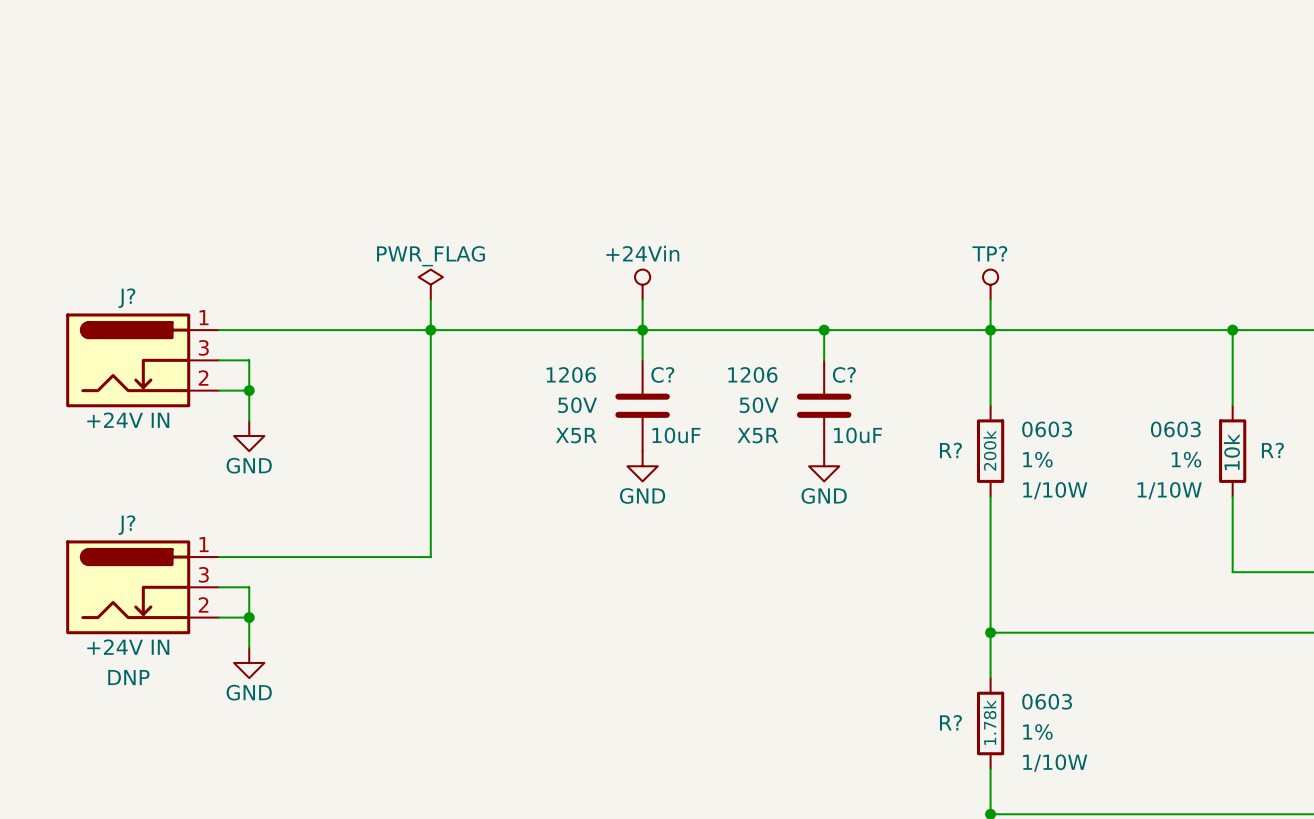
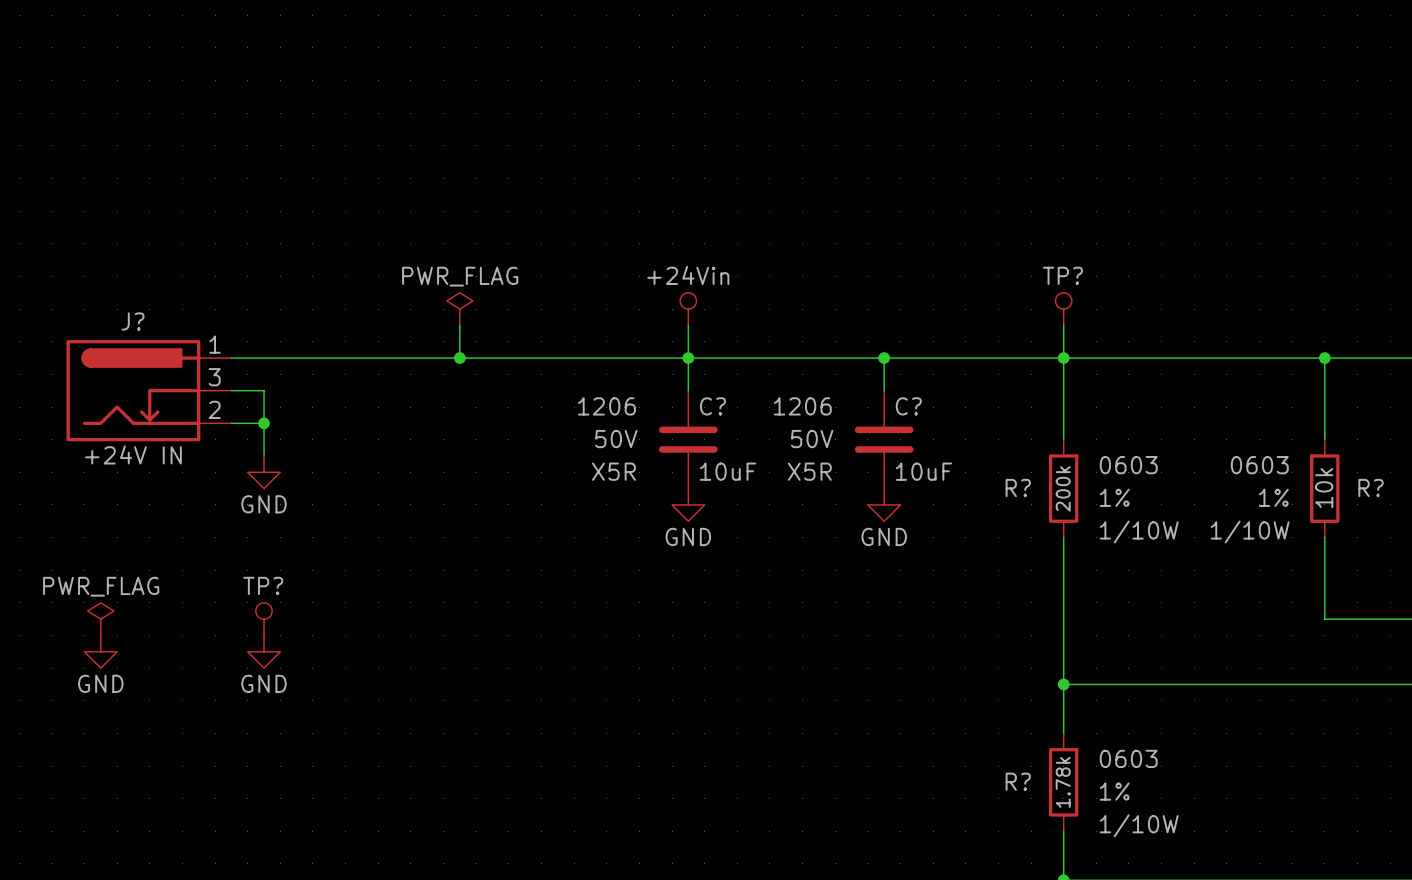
wire: (430, 330) (430, 557) (218, 557) -> none
power symbol: none -> PWR_FLAG (100, 619)
TP?: none -> (264, 619)
J?: +24V IN (142, 587) -> none
wire: (218, 587) (249, 587) (249, 647) -> none
power symbol: none -> GND (100, 651)
wire: (218, 617) (249, 617) -> none
junction: (249, 617) -> none
power symbol position: GND (249, 662) -> GND (264, 651)

